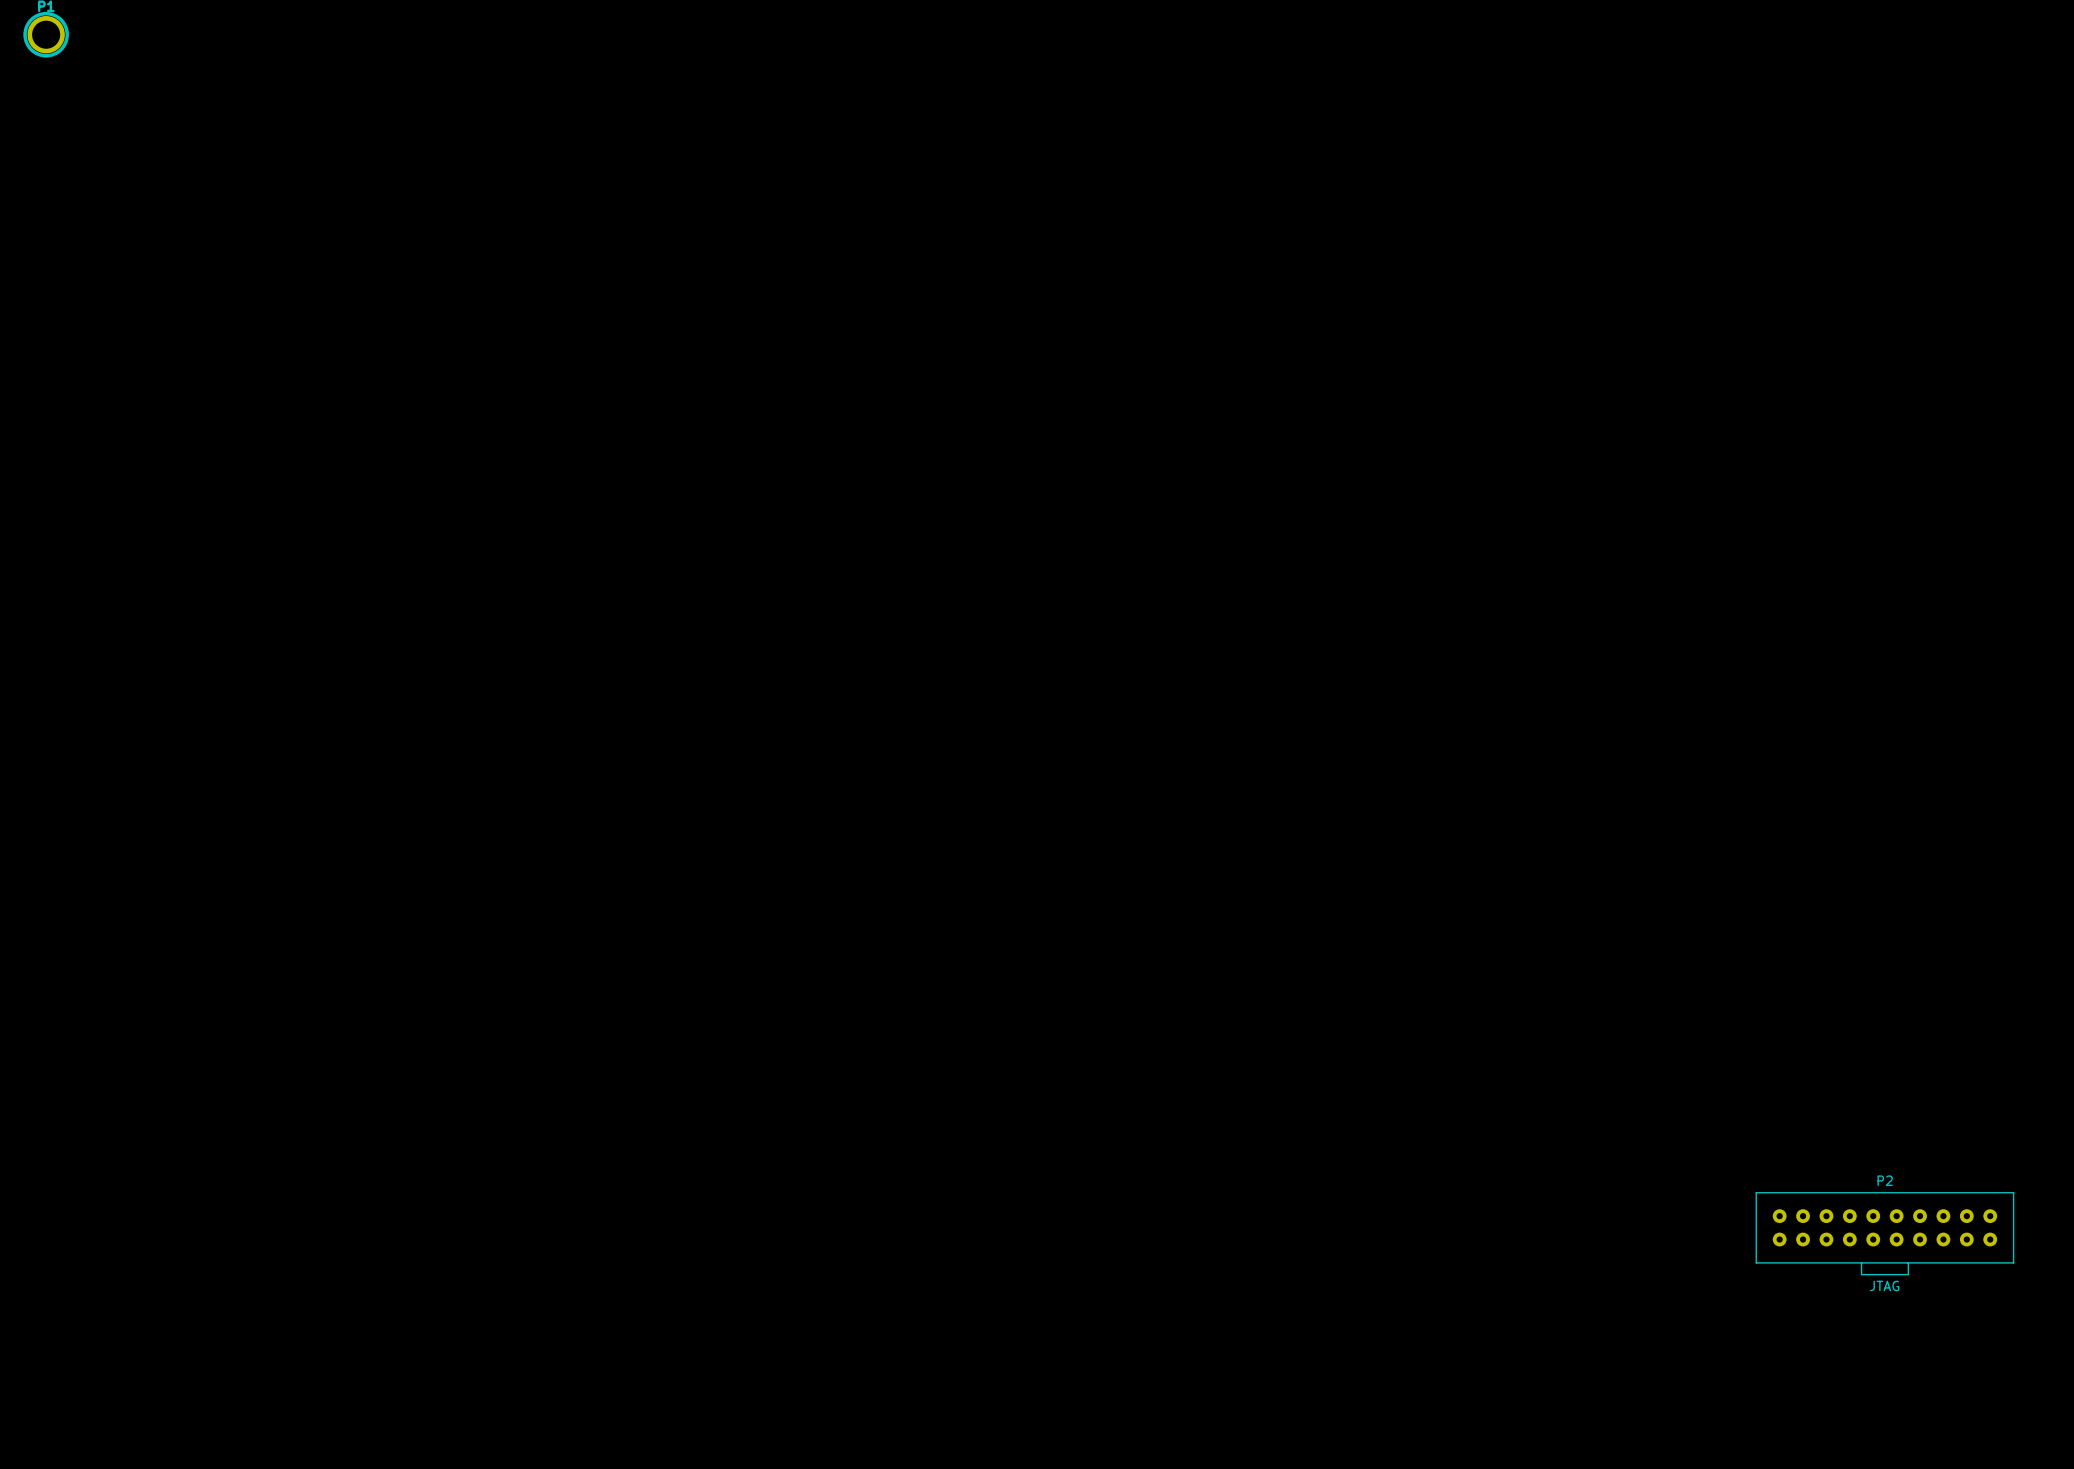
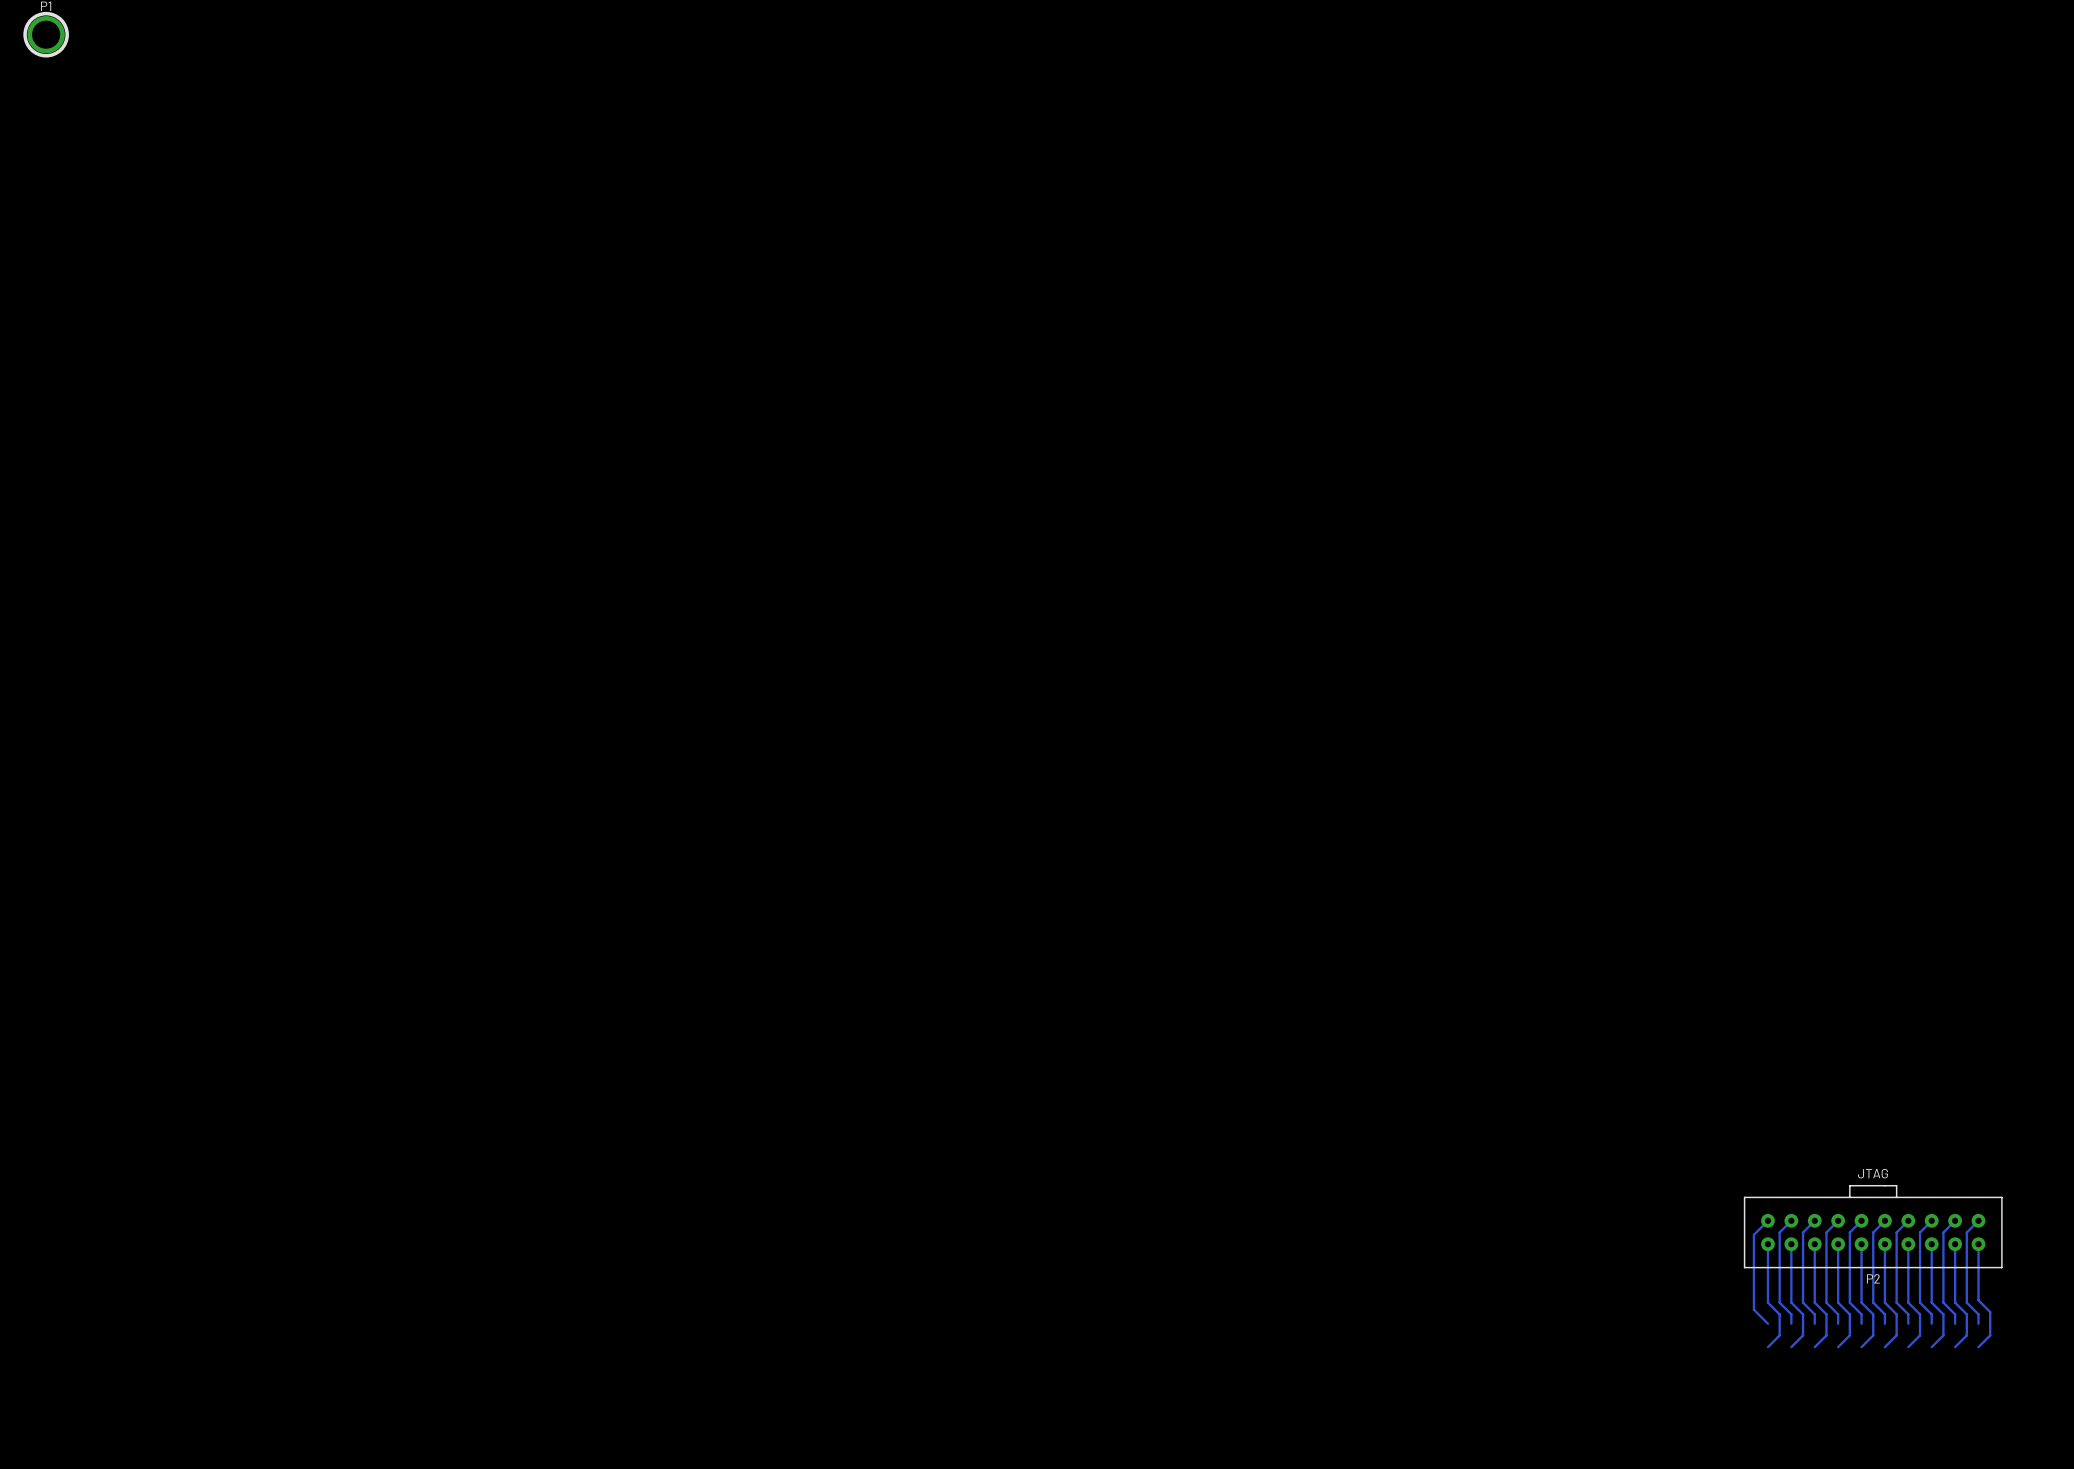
bottom track: none -> (1767, 1220) (1753, 1234) (1753, 1309) (1767, 1323)
bottom track: none -> (1791, 1220) (1779, 1232) (1779, 1302) (1791, 1314) (1791, 1323)
bottom track: none -> (1814, 1220) (1803, 1232) (1803, 1302) (1814, 1314) (1814, 1323)
bottom track: none -> (1838, 1220) (1826, 1232) (1826, 1302) (1838, 1314) (1838, 1323)
bottom track: none -> (1861, 1220) (1849, 1232) (1849, 1302) (1861, 1314) (1861, 1323)
bottom track: none -> (1884, 1220) (1873, 1232) (1873, 1302) (1884, 1314) (1884, 1323)
bottom track: none -> (1908, 1220) (1896, 1232) (1896, 1302) (1908, 1314) (1908, 1323)
bottom track: none -> (1931, 1220) (1920, 1232) (1920, 1302) (1931, 1314) (1931, 1323)
bottom track: none -> (1955, 1220) (1943, 1232) (1943, 1302) (1955, 1314) (1955, 1323)
bottom track: none -> (1978, 1220) (1966, 1232) (1966, 1302) (1978, 1314) (1978, 1323)
P2 rotation: 0° (1884, 1233) -> 180° (1873, 1226)
bottom track: none -> (1767, 1244) (1767, 1302) (1779, 1314) (1779, 1335) (1767, 1347)
bottom track: none -> (1791, 1244) (1791, 1302) (1803, 1314) (1803, 1335) (1791, 1347)
bottom track: none -> (1814, 1244) (1814, 1302) (1826, 1314) (1826, 1335) (1814, 1347)
bottom track: none -> (1838, 1244) (1838, 1302) (1849, 1314) (1849, 1335) (1838, 1347)
bottom track: none -> (1861, 1244) (1861, 1302) (1873, 1314) (1873, 1335) (1861, 1347)
bottom track: none -> (1884, 1244) (1884, 1302) (1896, 1314) (1896, 1335) (1884, 1347)
bottom track: none -> (1908, 1244) (1908, 1302) (1920, 1314) (1920, 1335) (1908, 1347)
bottom track: none -> (1931, 1244) (1931, 1302) (1943, 1314) (1943, 1335) (1931, 1347)
bottom track: none -> (1955, 1244) (1955, 1302) (1966, 1314) (1966, 1335) (1955, 1347)
bottom track: none -> (1978, 1244) (1978, 1300) (1990, 1312) (1990, 1335) (1978, 1347)

